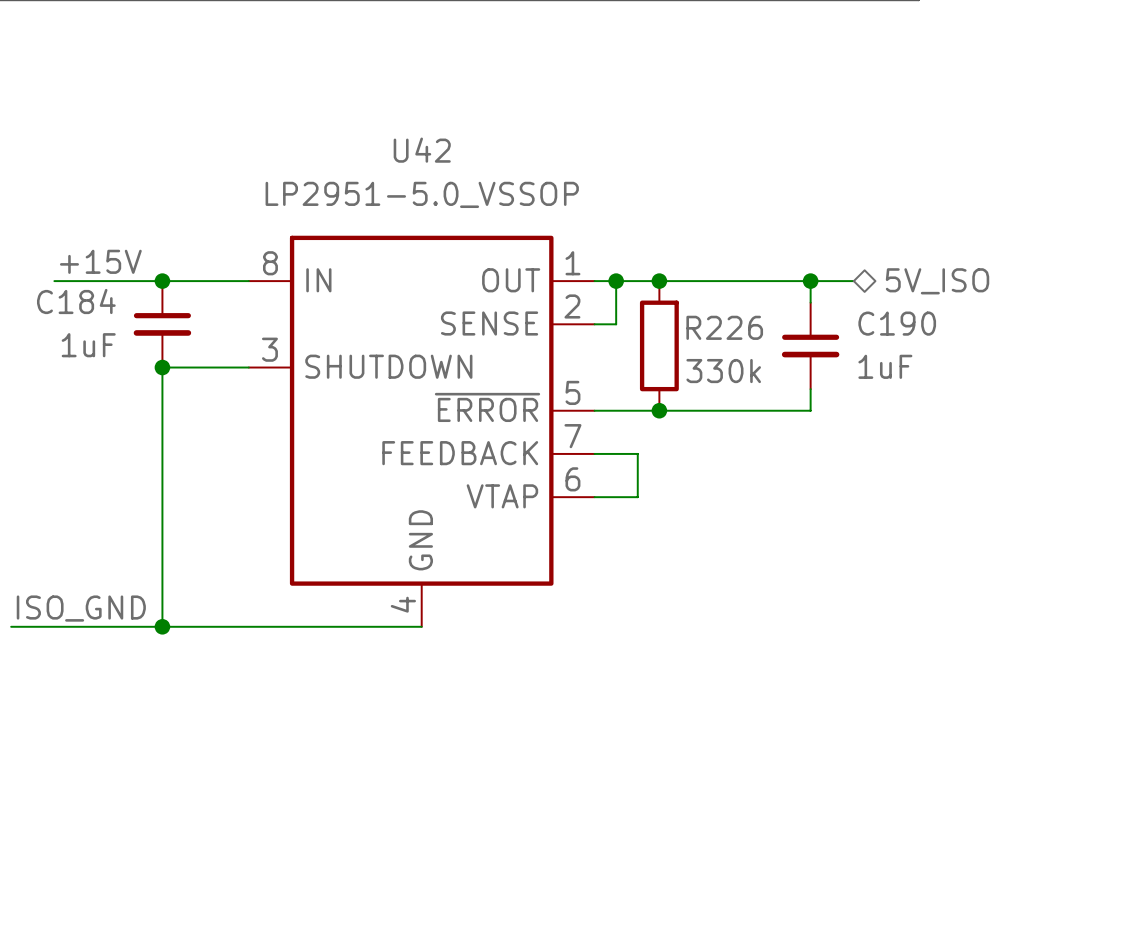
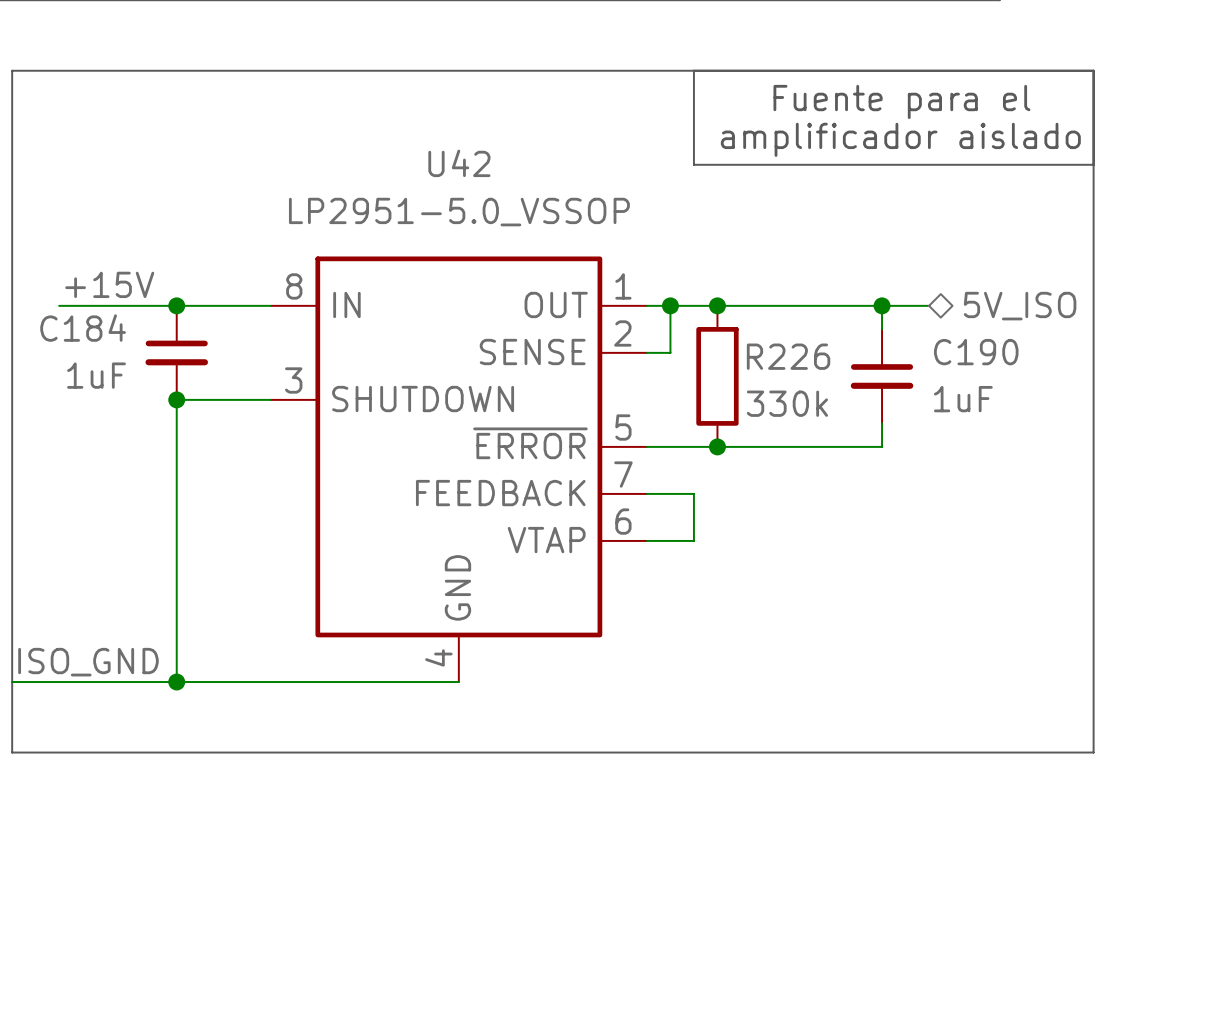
line: none -> (12, 70) (1093, 70) (1093, 752) (12, 752) (12, 70)
line: none -> (693, 70) (693, 164) (1093, 164)
text: none -> Fuente para el (901, 101)
text: none -> amplificador aislado (900, 139)

